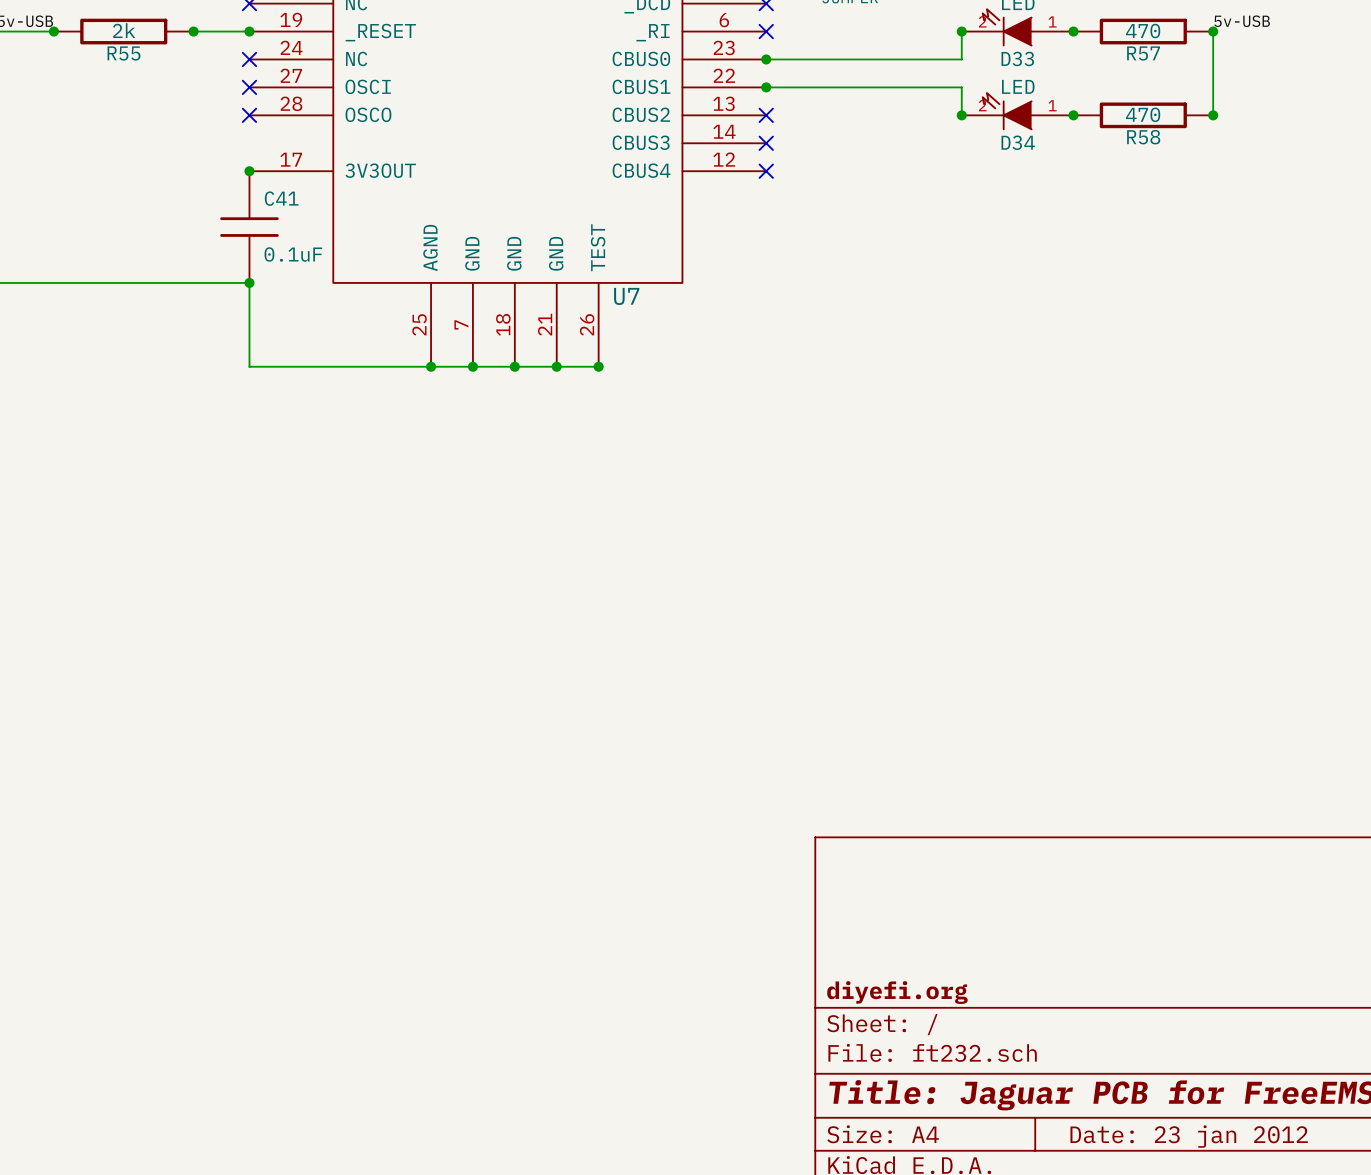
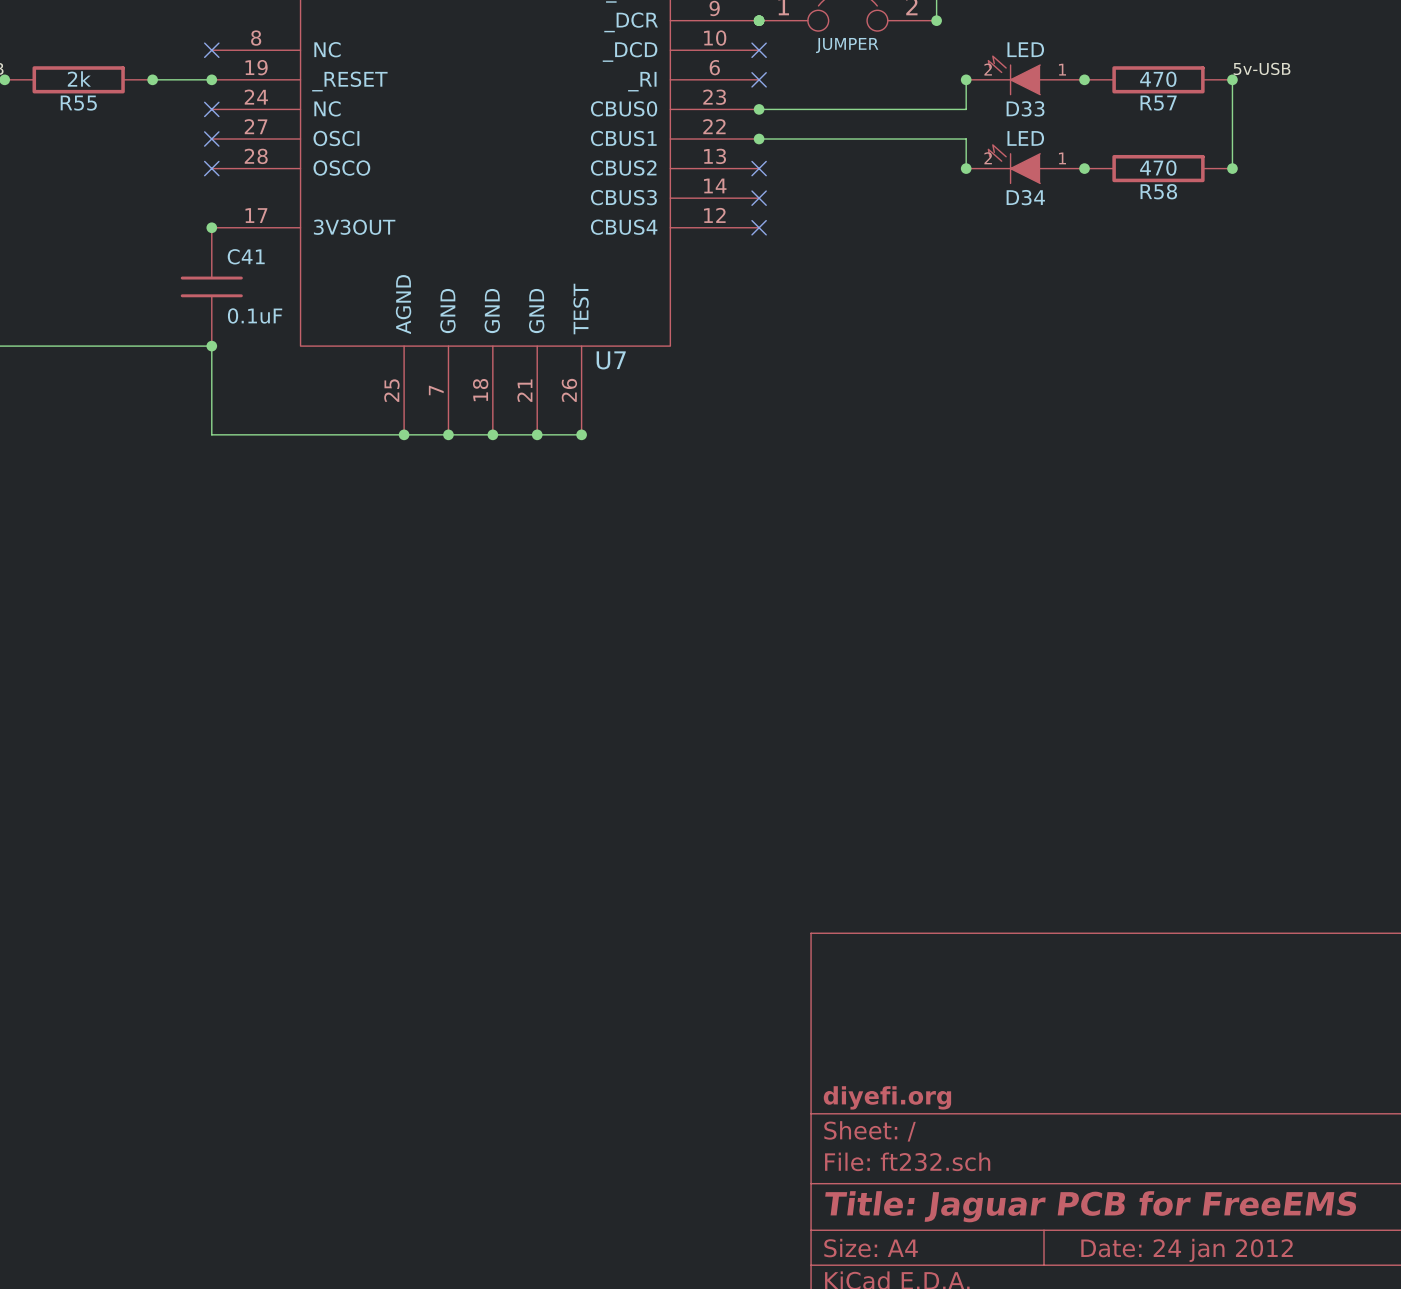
title block: Date: 23 jan 2012 (1189, 1136) -> Date: 24 jan 2012 (1187, 1250)

